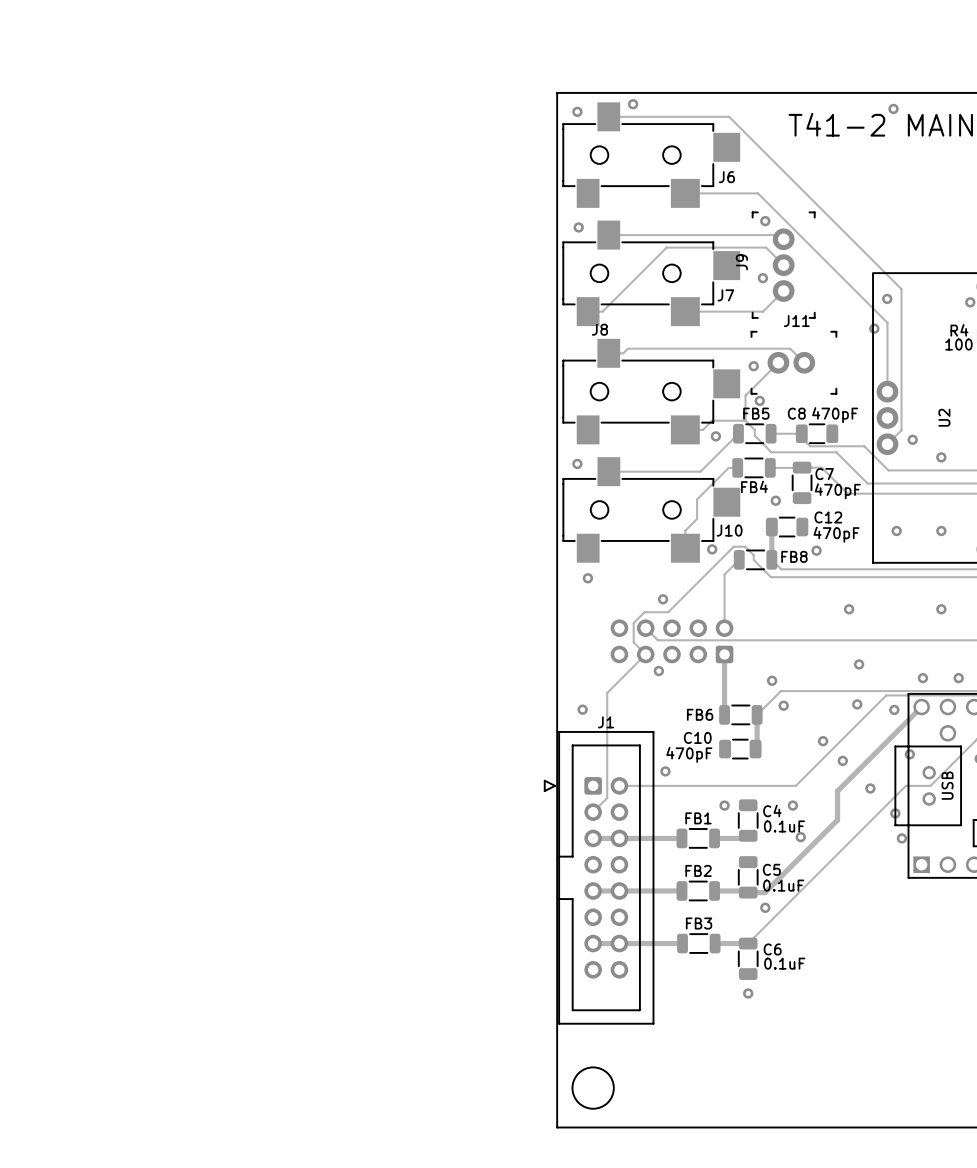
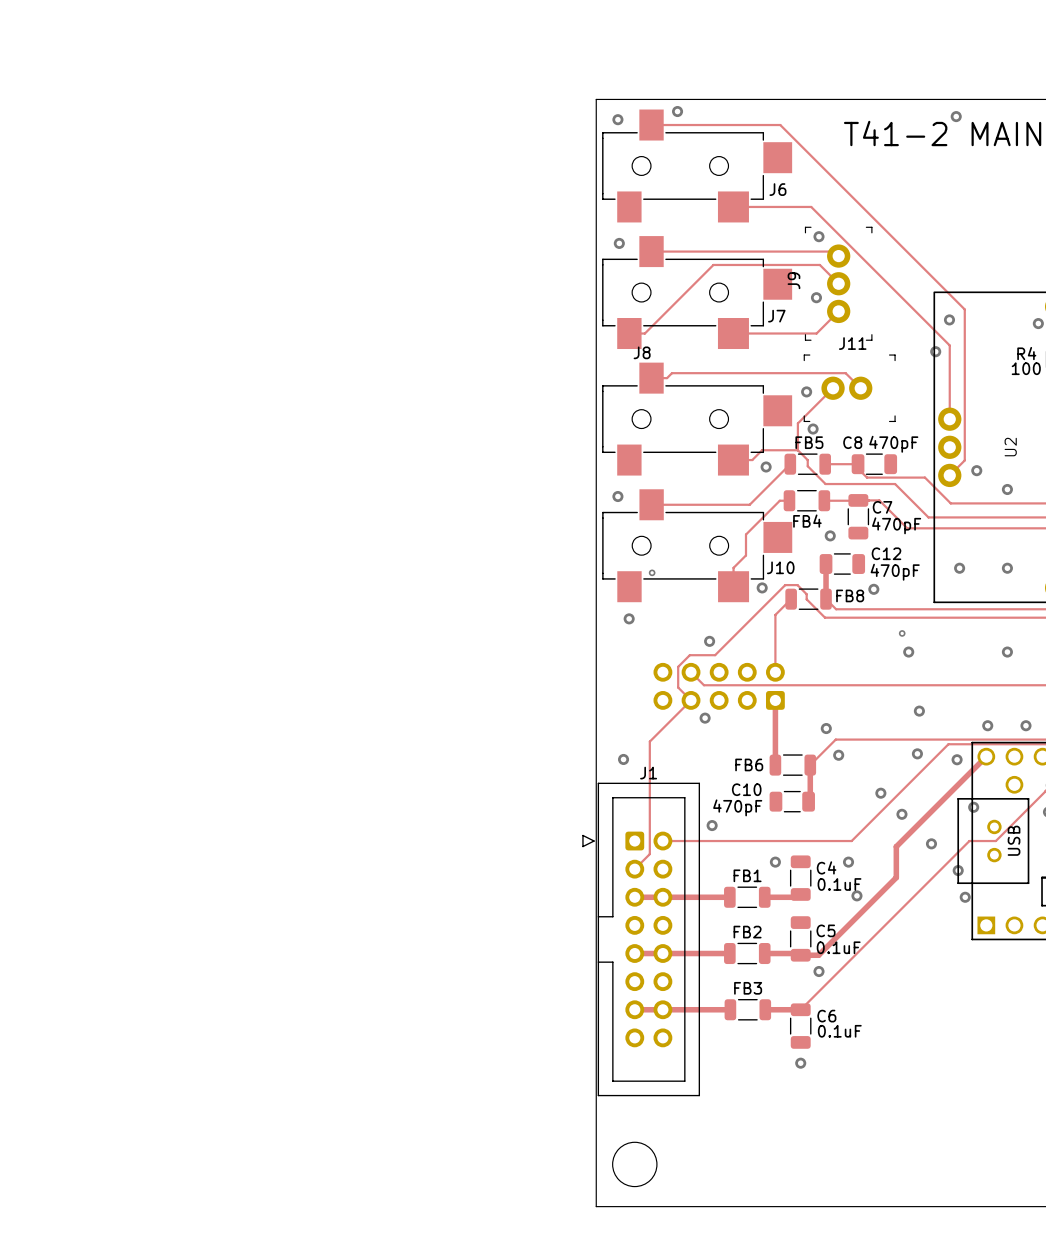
via: none -> (652, 572)
via: none -> (902, 633)

